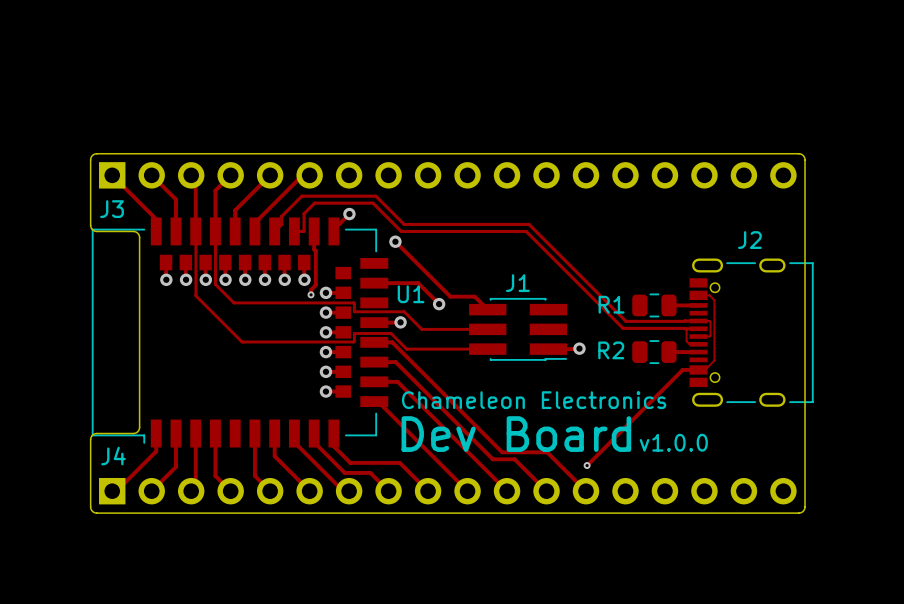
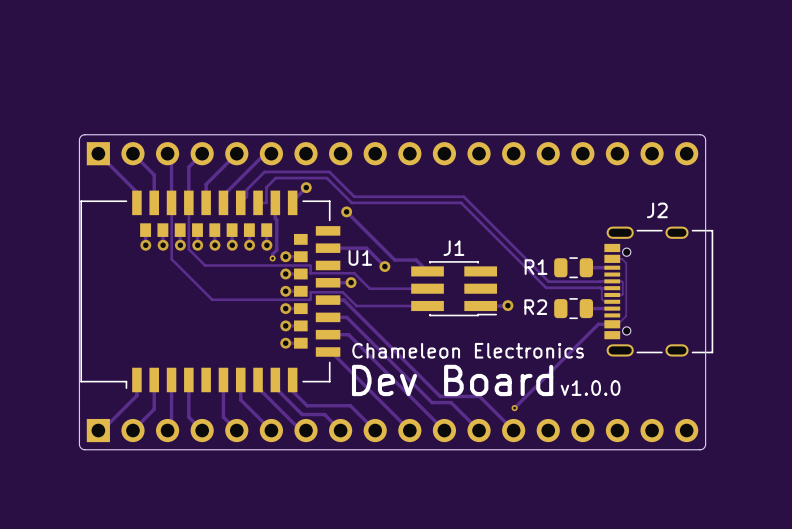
J3 name: J3 (112, 209) -> none
board edge: (90, 225) (95, 231) (134, 231) (138, 233) (139, 237) (139, 428) (134, 433) (95, 433) (90, 439) -> (79, 197) (79, 385)
J4 name: J4 (113, 456) -> none

